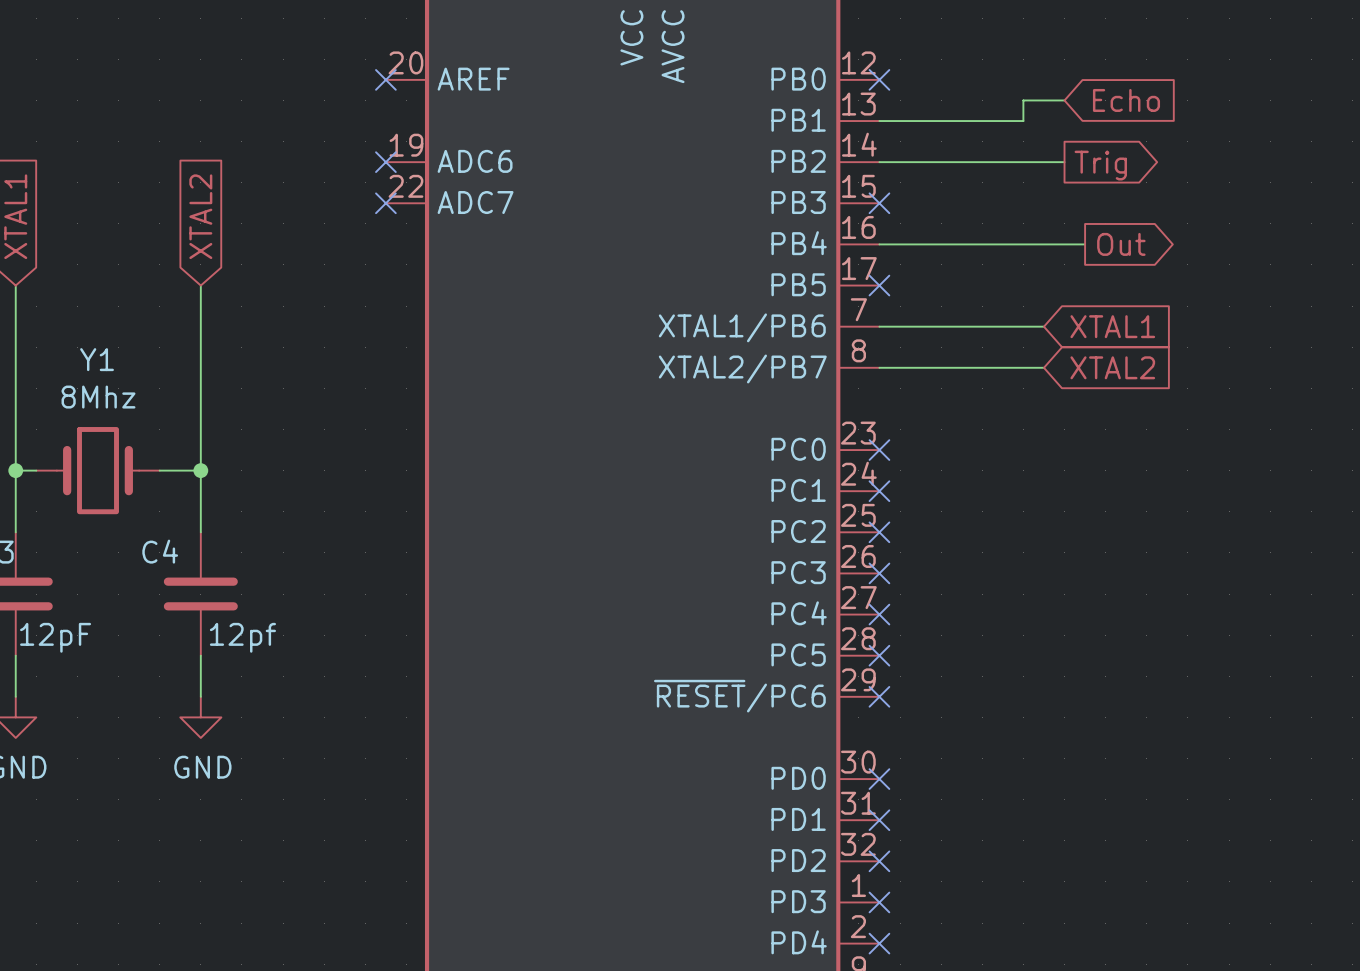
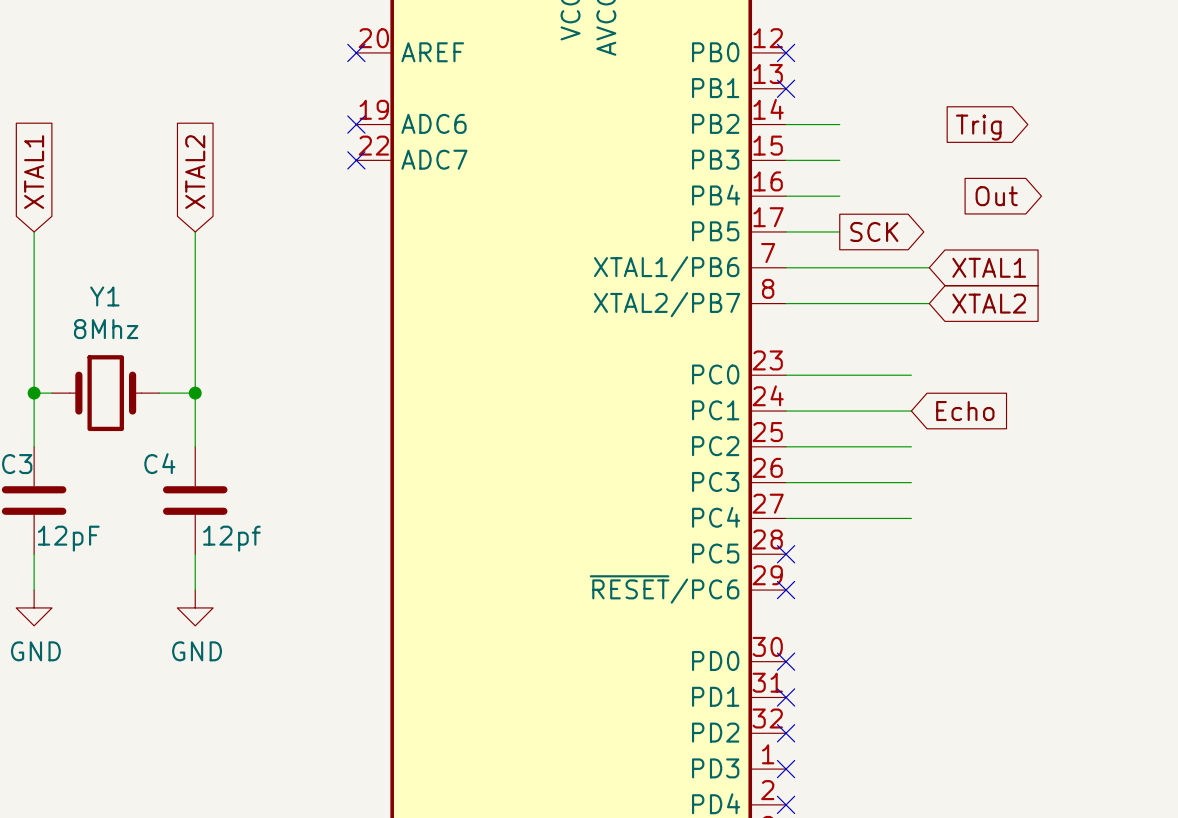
wire: (1064, 100) (1023, 100) (1023, 121) (879, 121) -> none
global label position: Echo (1126, 100) -> Echo (965, 411)
no-connect mark: none -> (786, 88)
wire: (941, 162) (1064, 162) -> none
wire: none -> (786, 160) (839, 160)
no-connect mark: (879, 203) -> none
wire: (941, 244) (1085, 244) -> (786, 375) (911, 375)
wire: none -> (786, 231) (839, 231)
no-connect mark: (879, 285) -> none
global label: none -> SCK (874, 231)
no-connect mark: (879, 450) -> none
wire: none -> (786, 411) (911, 411)
no-connect mark: (879, 491) -> none
wire: none -> (786, 446) (911, 446)
no-connect mark: (879, 532) -> none
wire: none -> (786, 482) (911, 482)
no-connect mark: (879, 573) -> none
wire: none -> (786, 518) (911, 518)
no-connect mark: (879, 614) -> none

